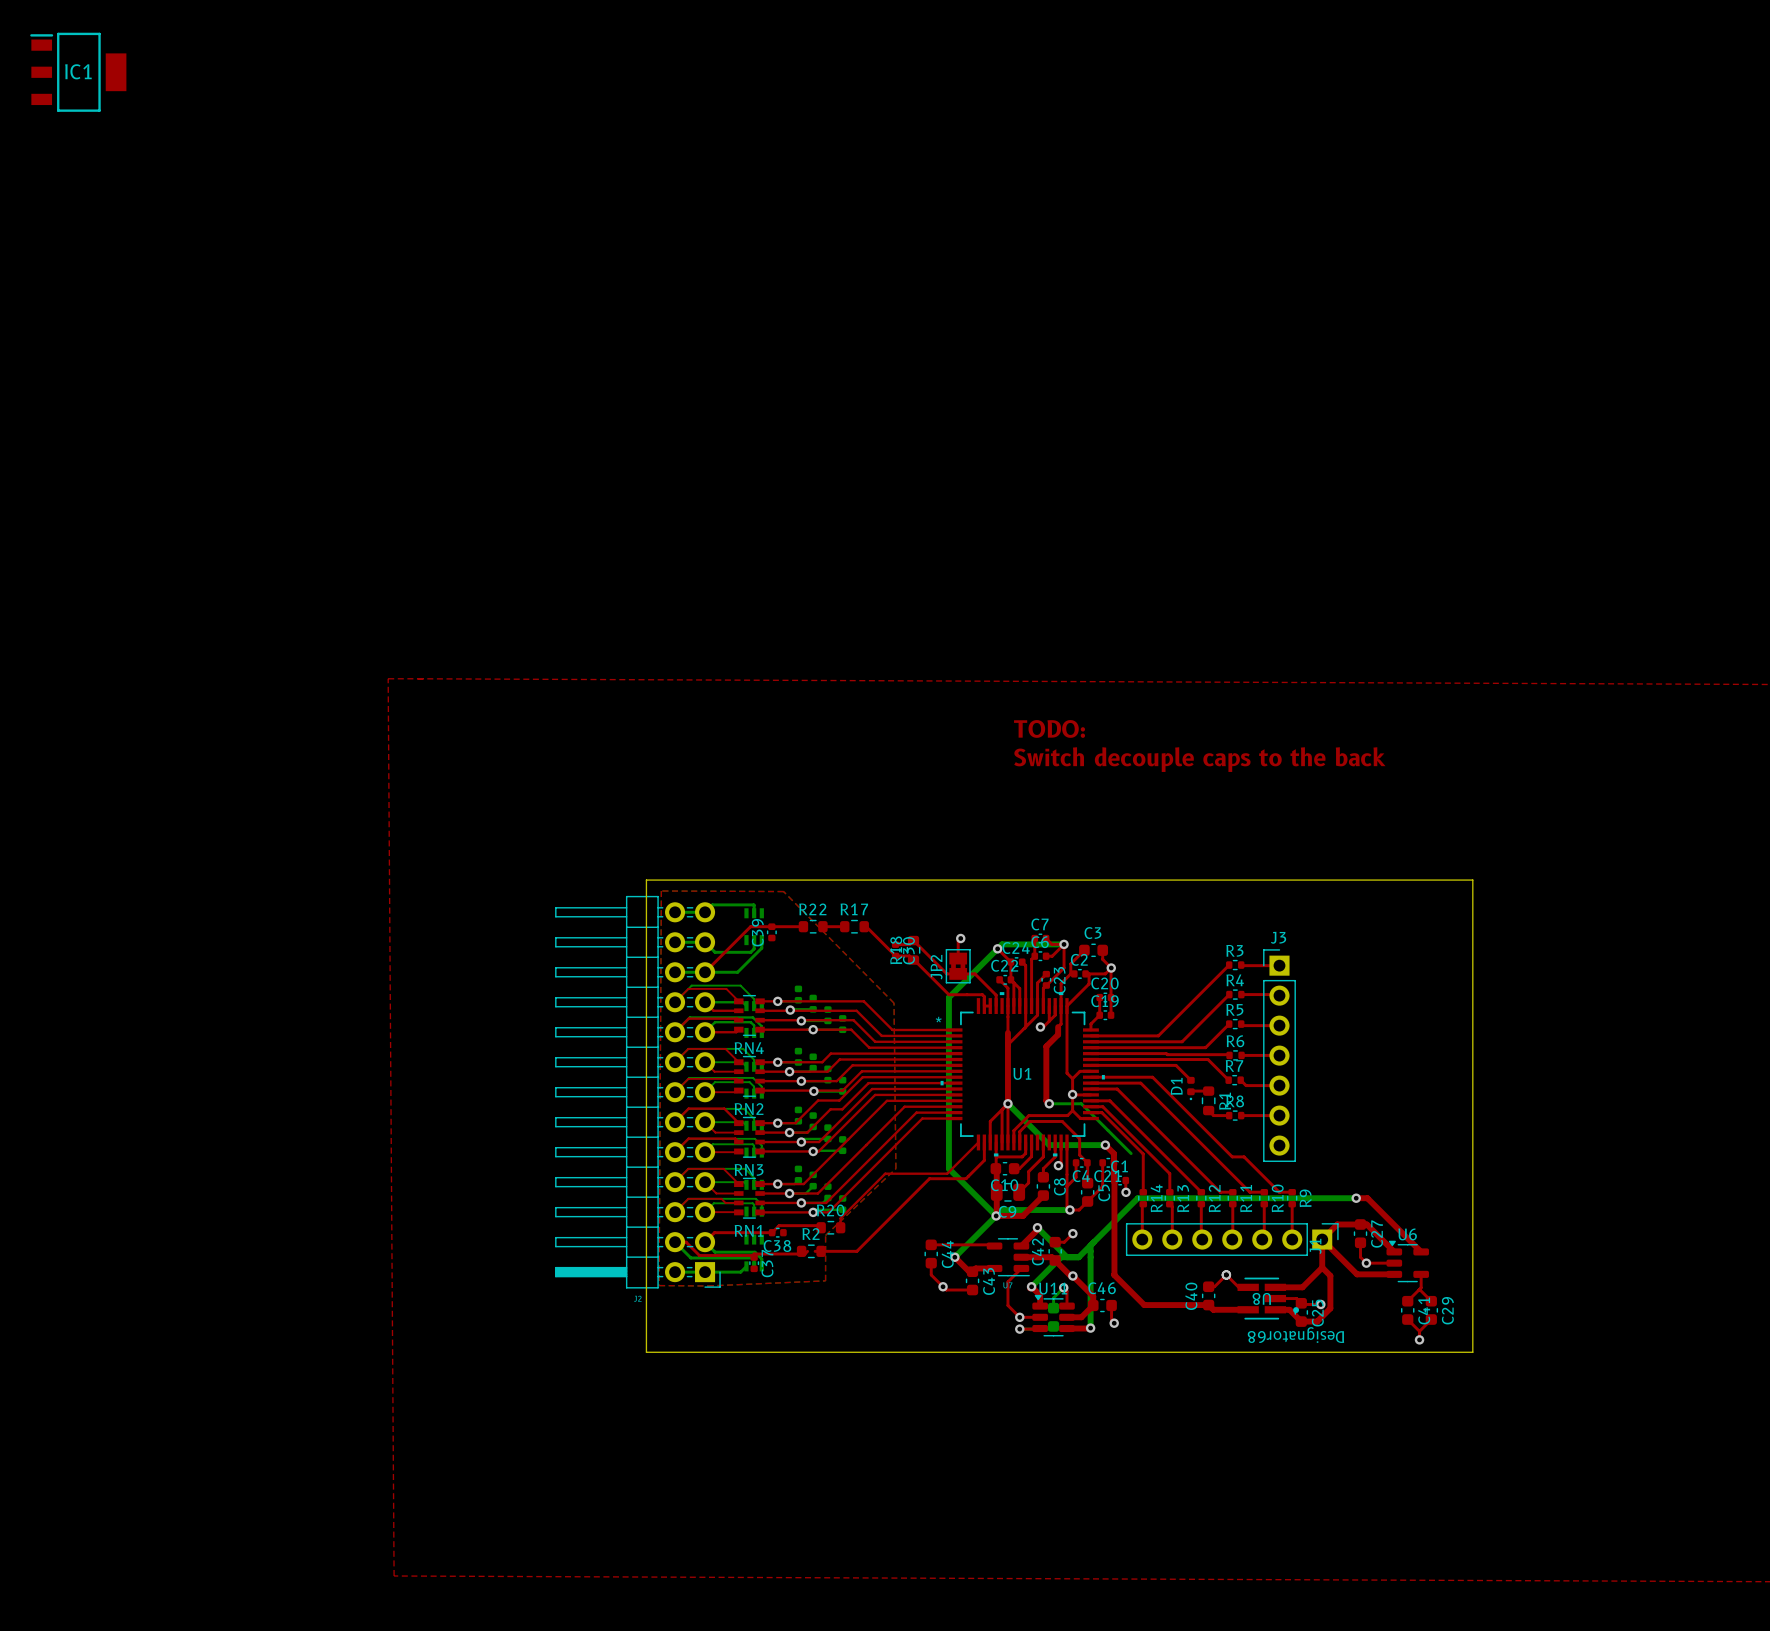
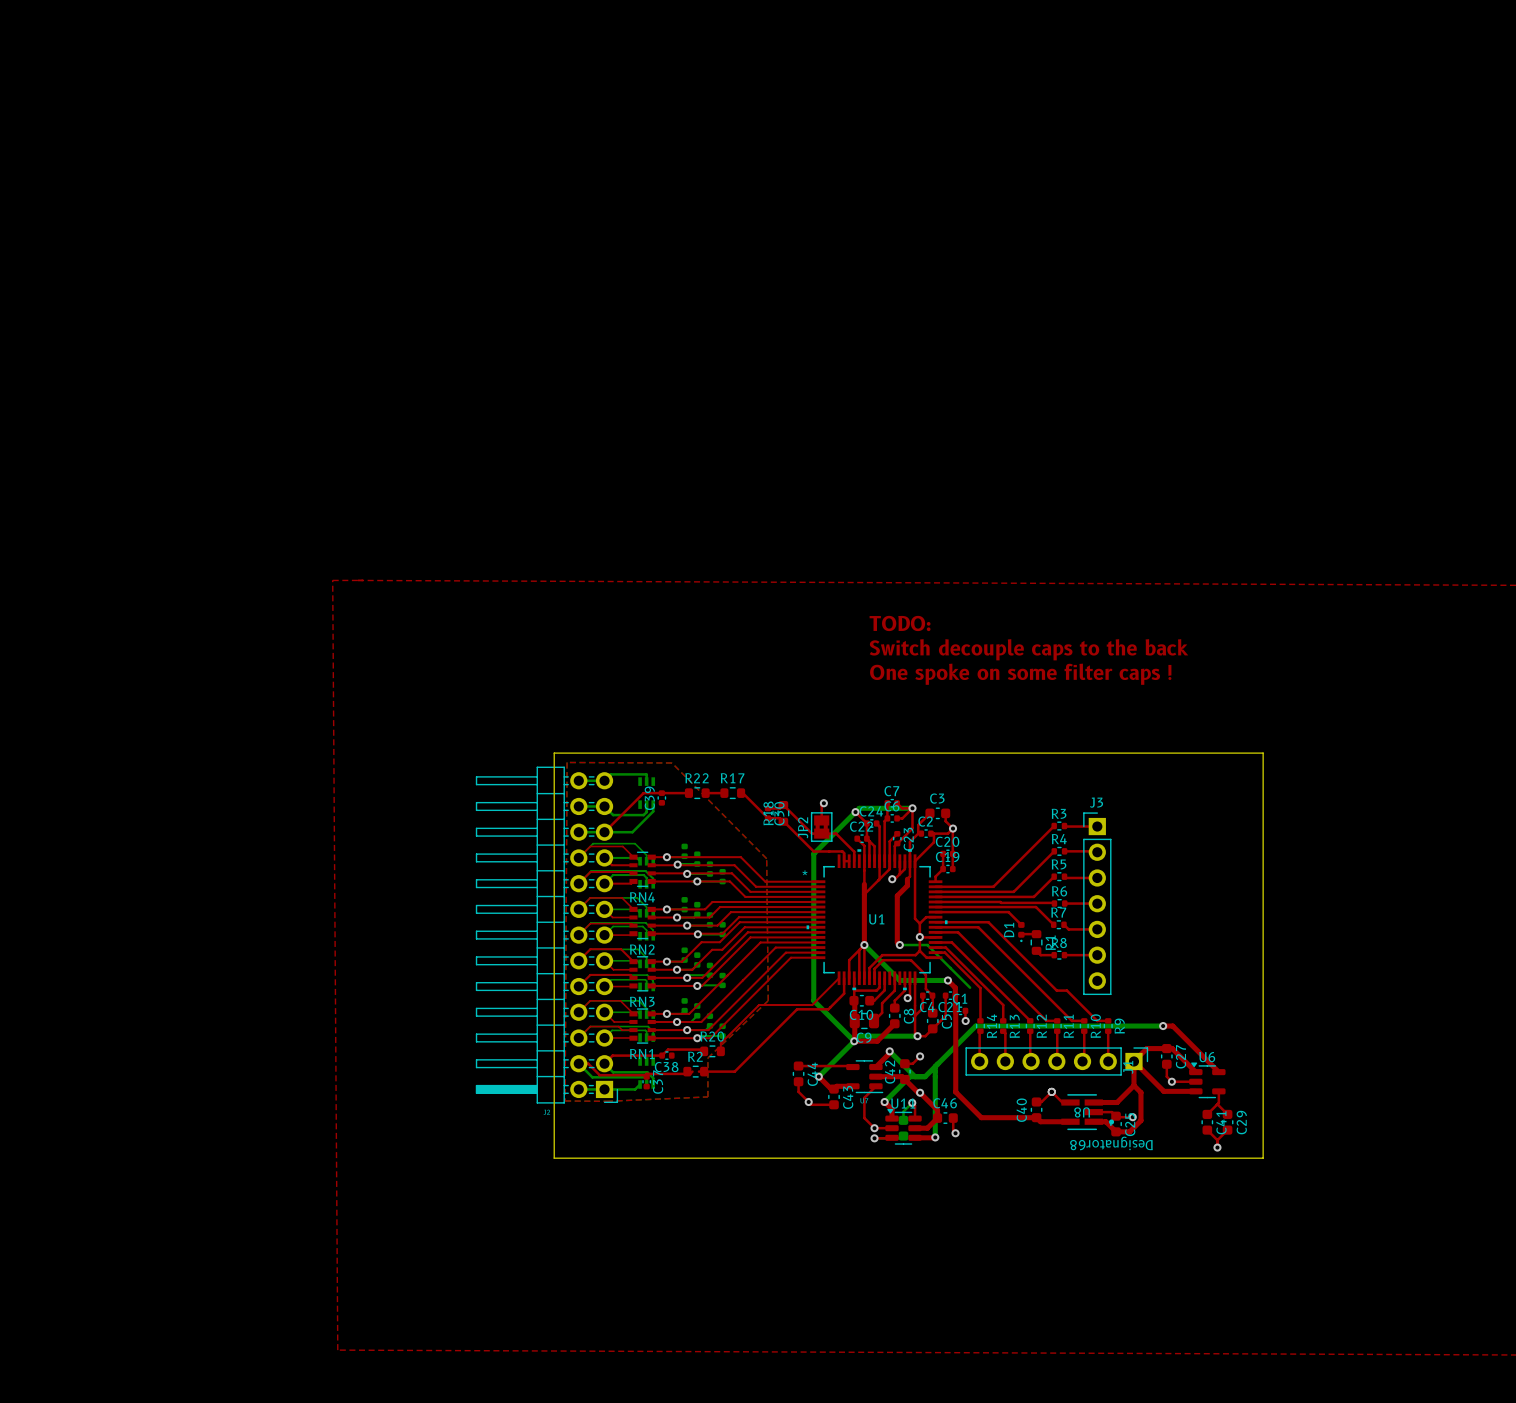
IC1: (78, 72) -> none
text: none -> One spoke on some filter caps ! (1020, 674)

